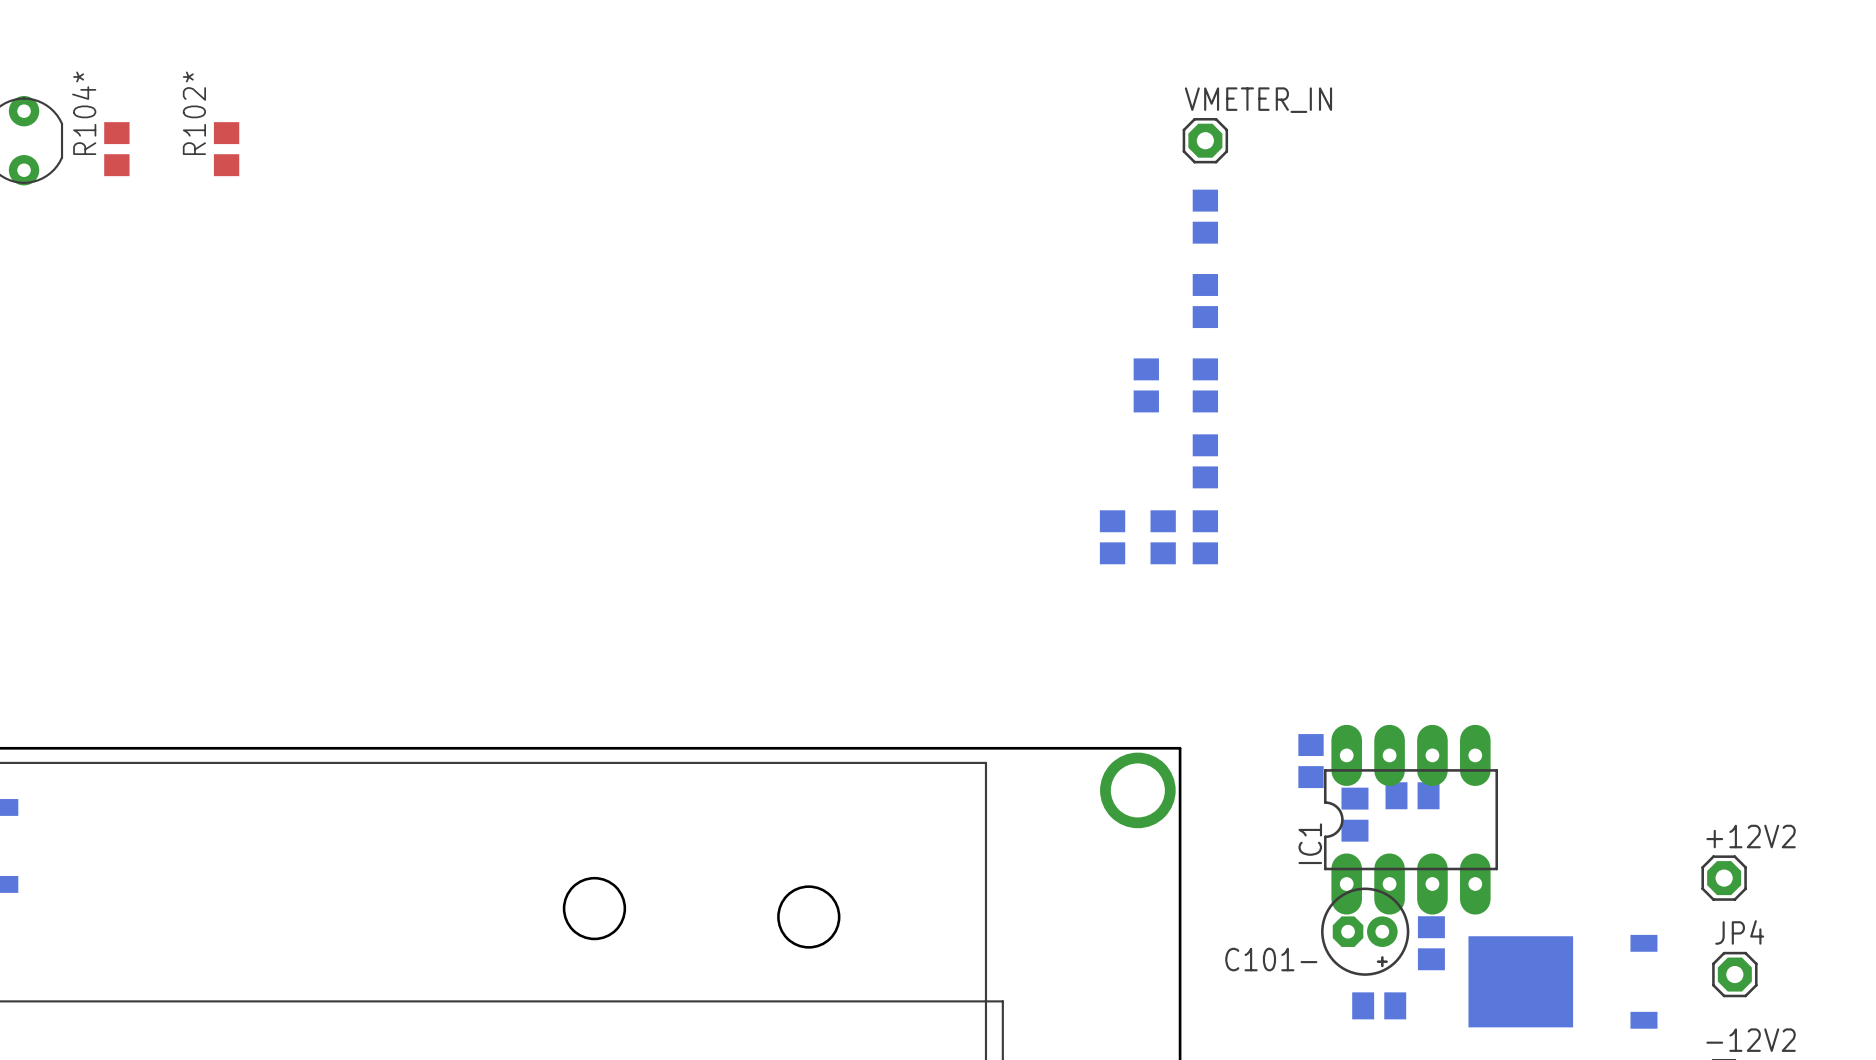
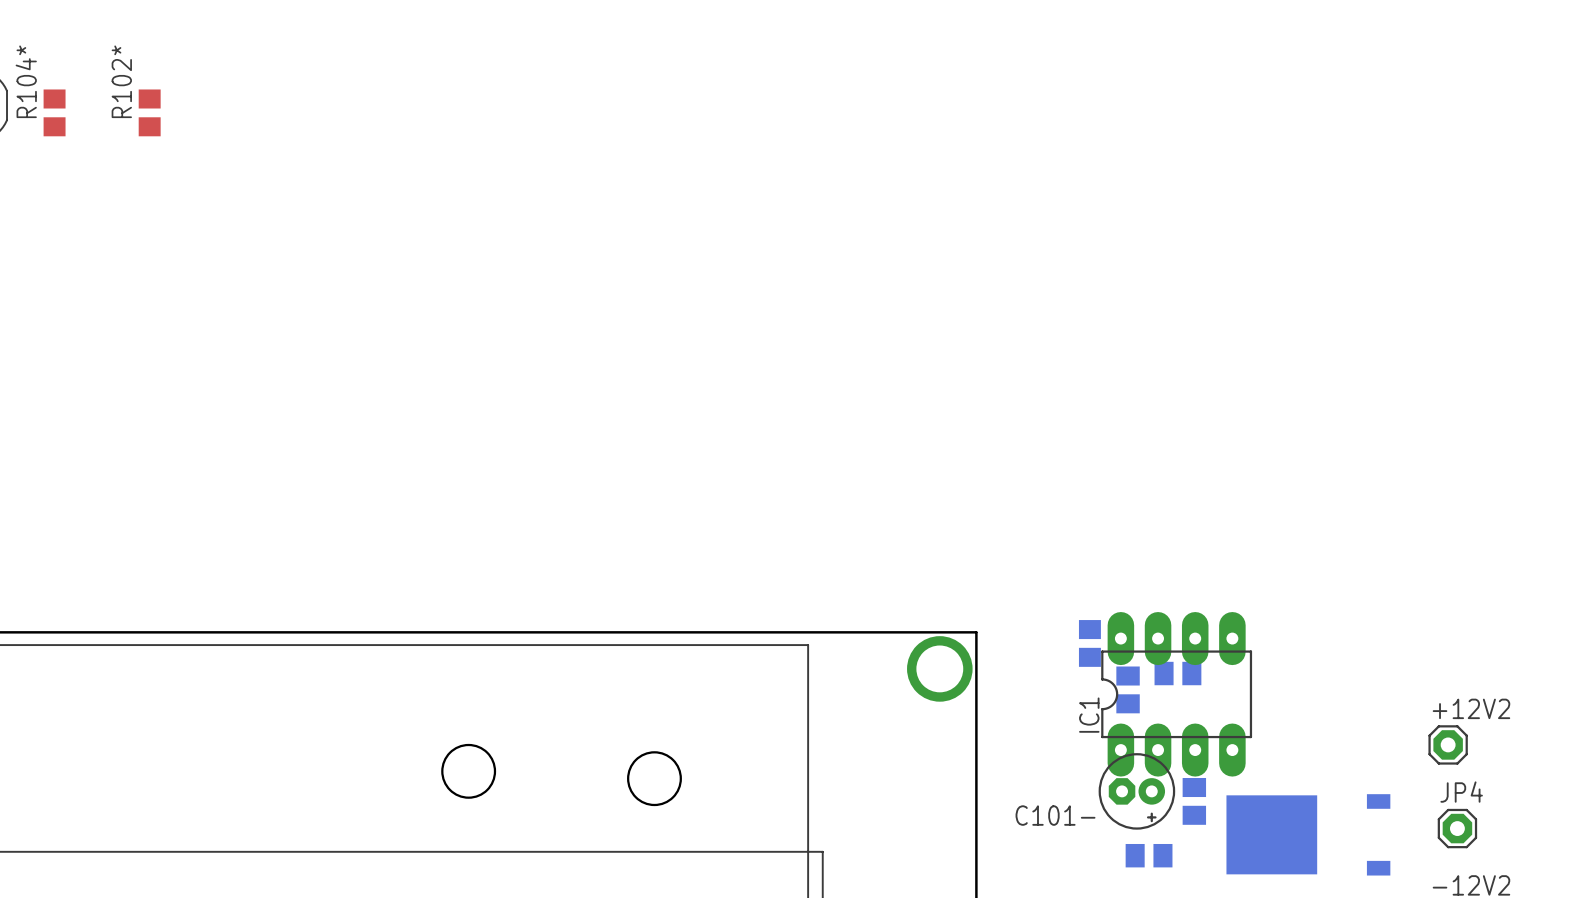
VMETER_IN: (1205, 140) -> none
part: (1205, 216) -> none
part: (1205, 301) -> none
part: (1146, 385) -> none
part: (1205, 385) -> none
part: (1205, 461) -> none
part: (1112, 537) -> none
part: (1163, 537) -> none
part: (1205, 537) -> none

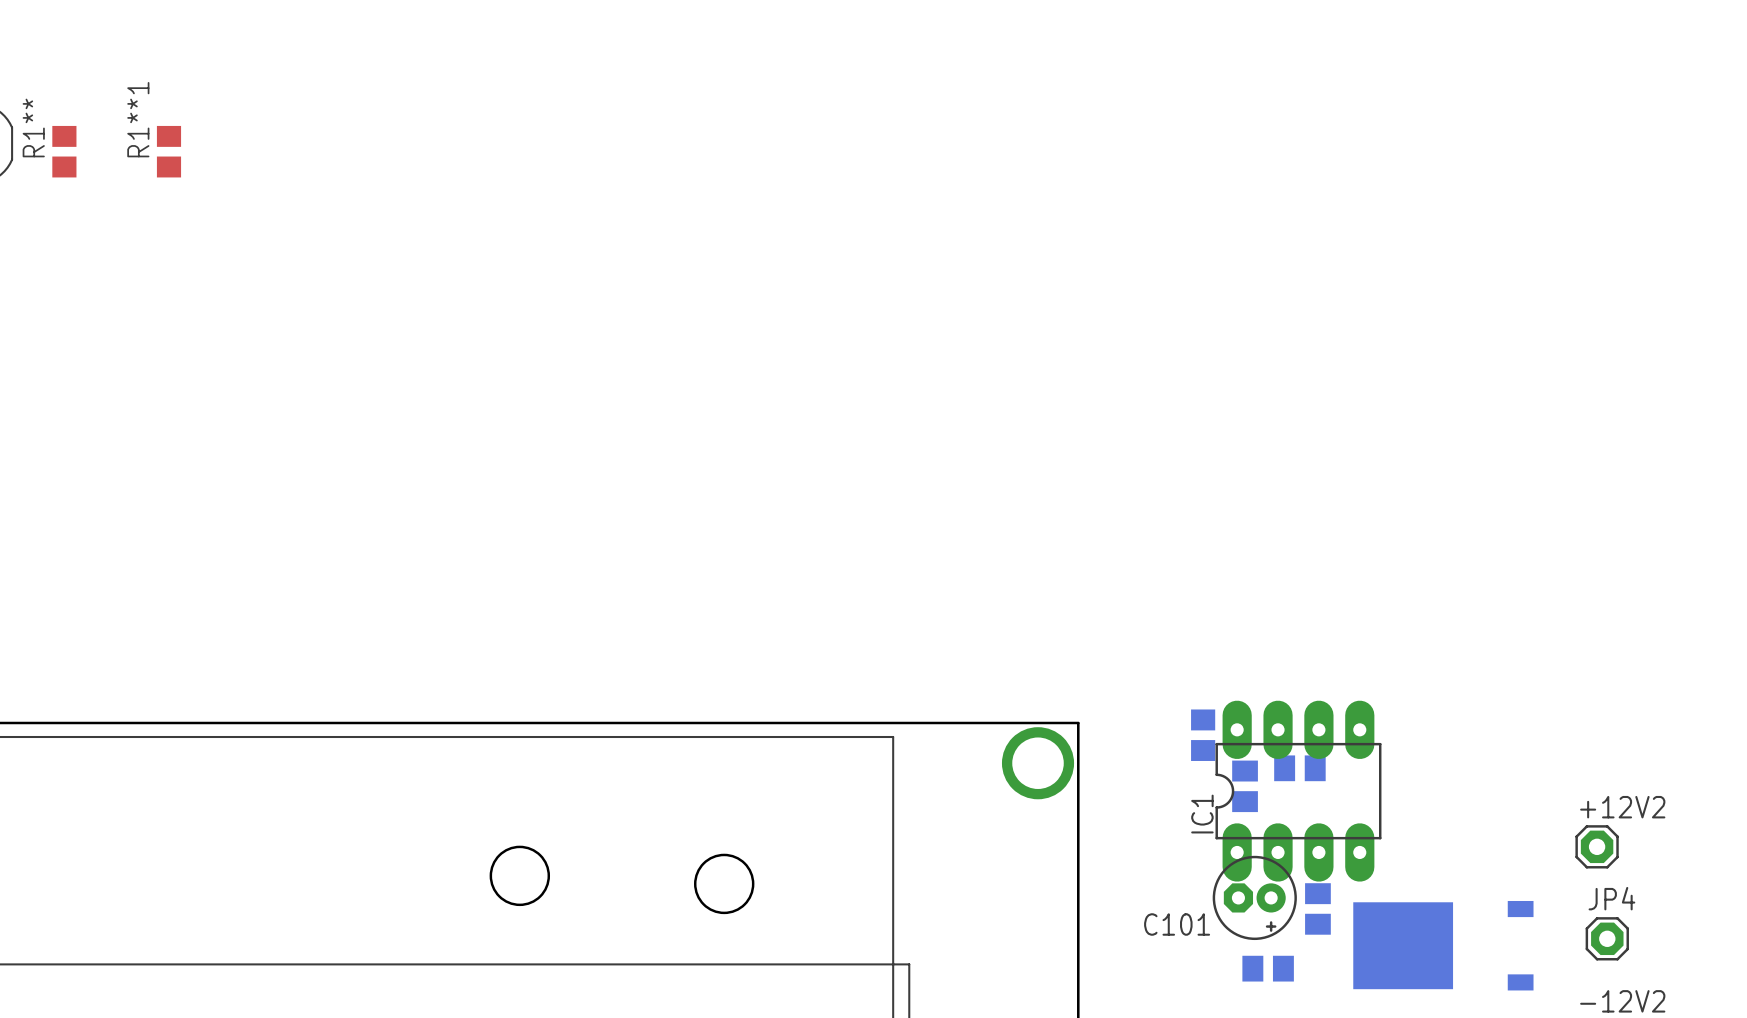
R104* name: R104* (26, 81) -> R1** (33, 127)
R102* name: R102* (121, 81) -> R1**1 (138, 119)
C101- name: C101- (1055, 815) -> C101 (1177, 924)

